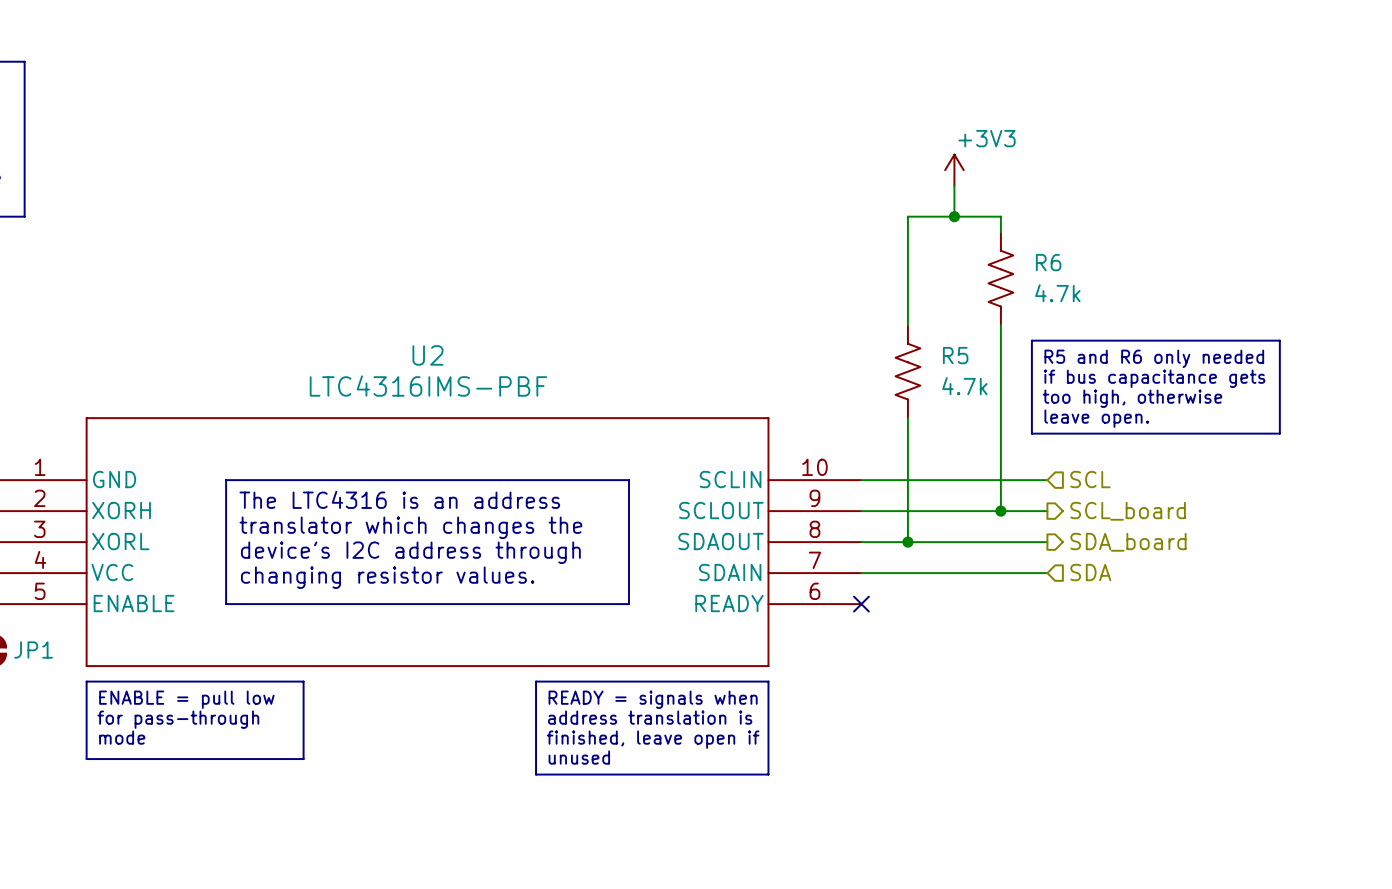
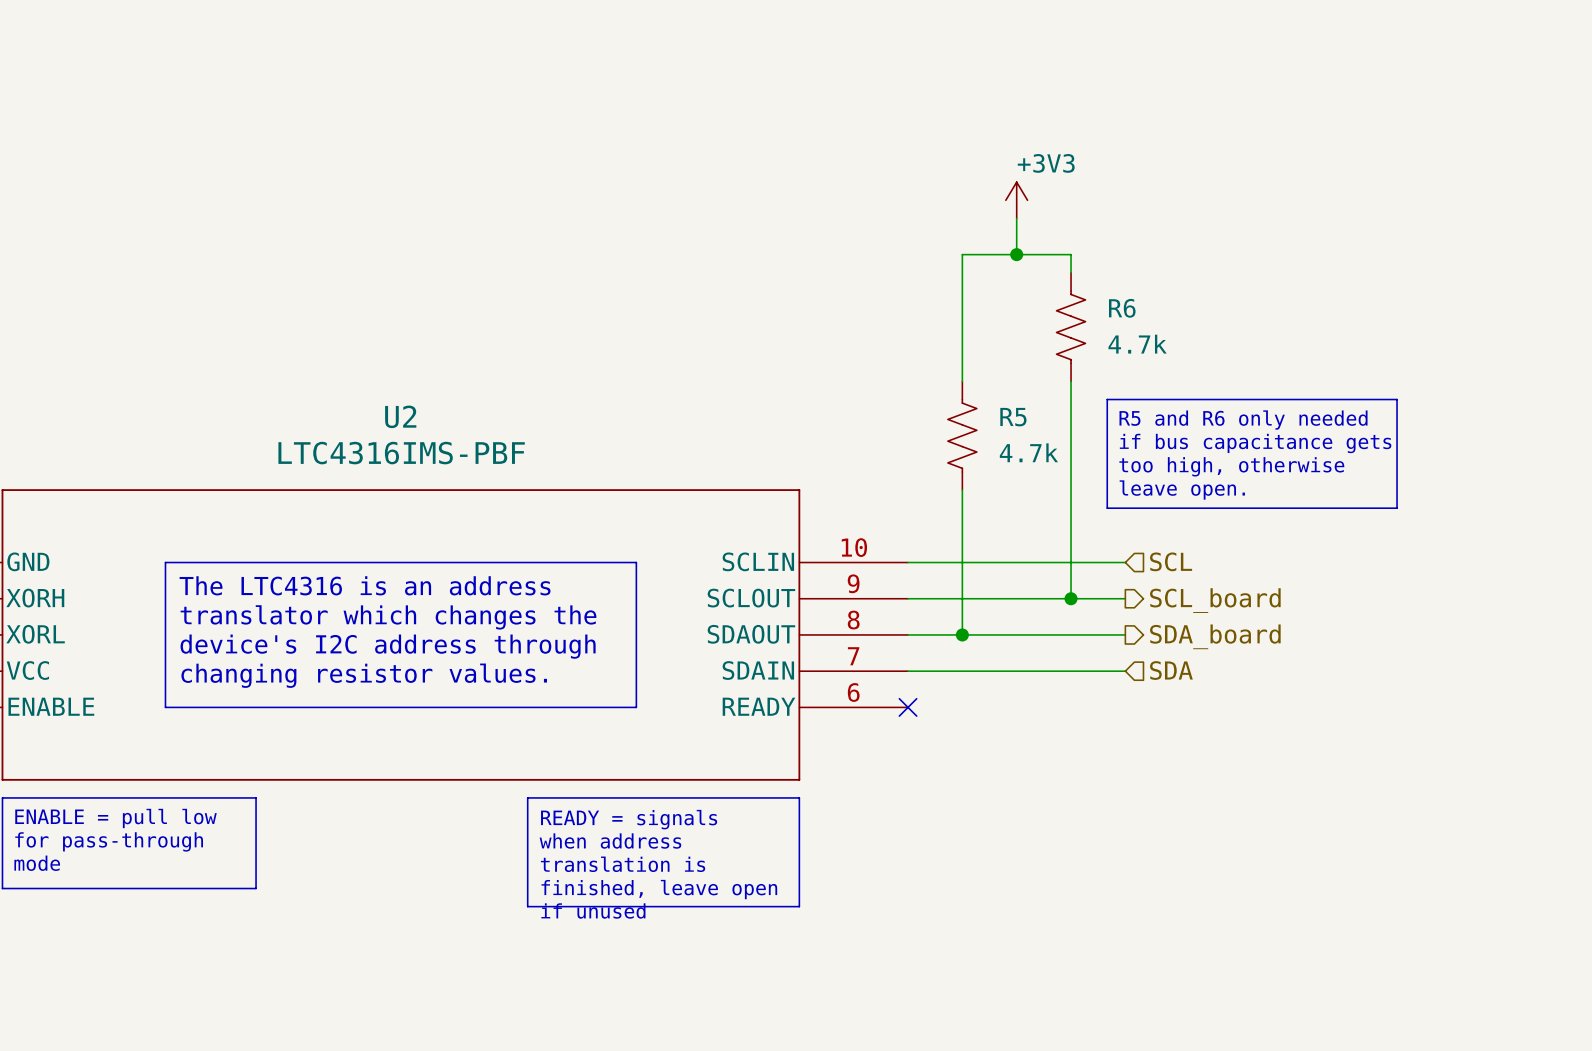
text: READY = signals when (653, 699) -> READY = signals (629, 819)
text: address translation is (650, 717) -> when address (610, 841)
text: finished, leave open if (653, 739) -> translation is (623, 864)
text: unused (579, 757) -> finished, leave open (659, 889)
text: none -> if unused (593, 910)

